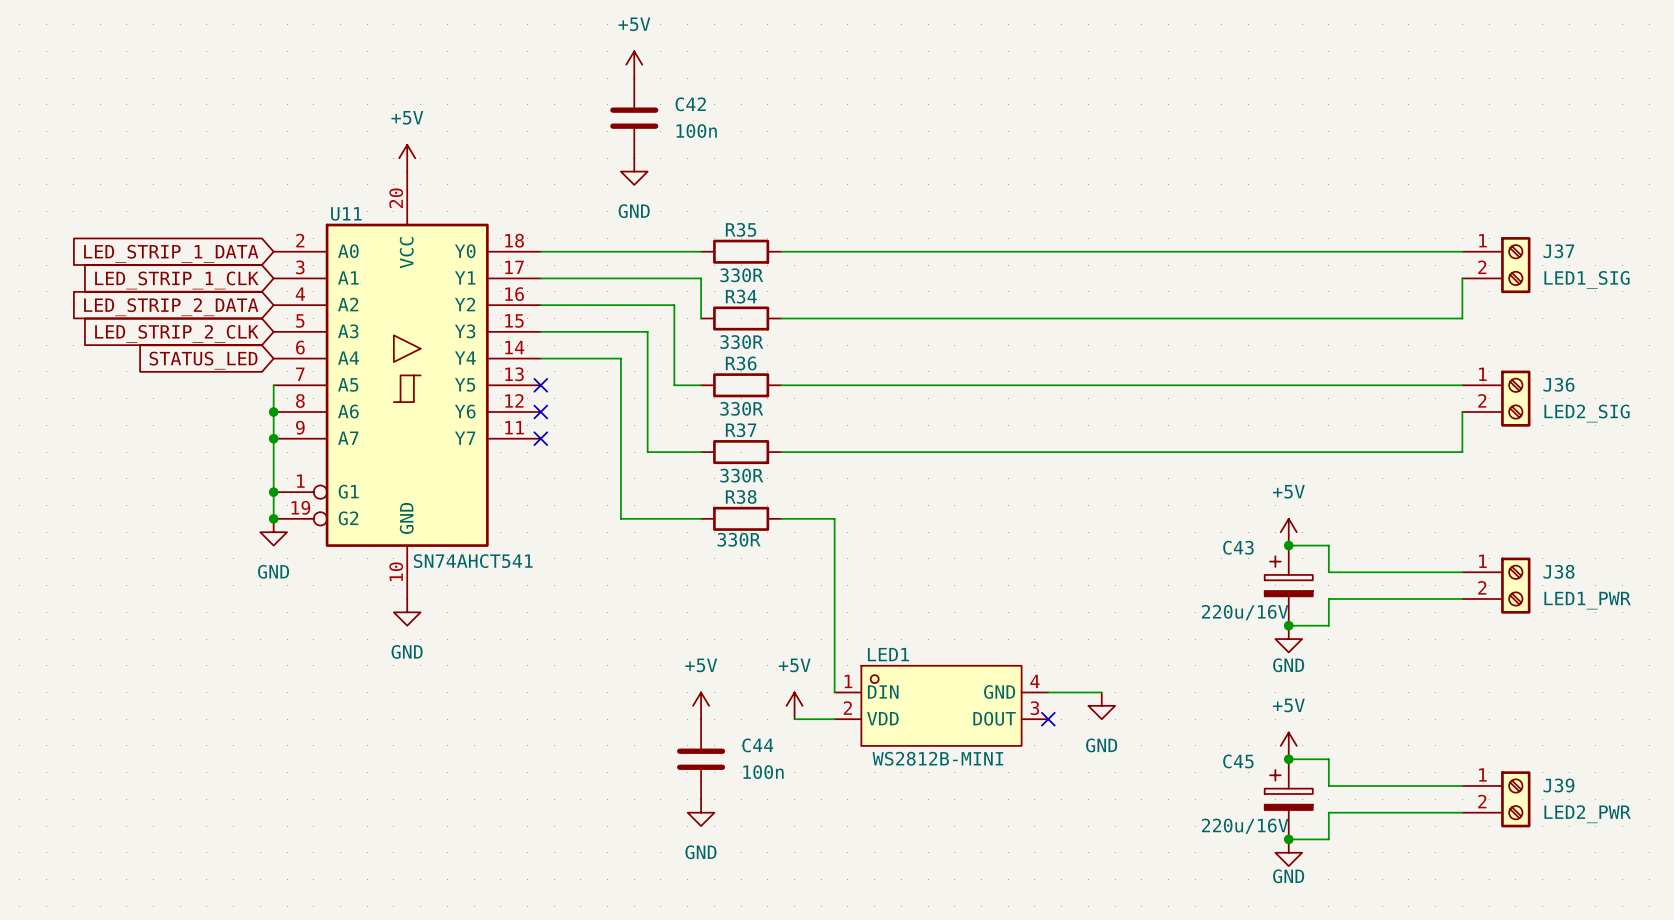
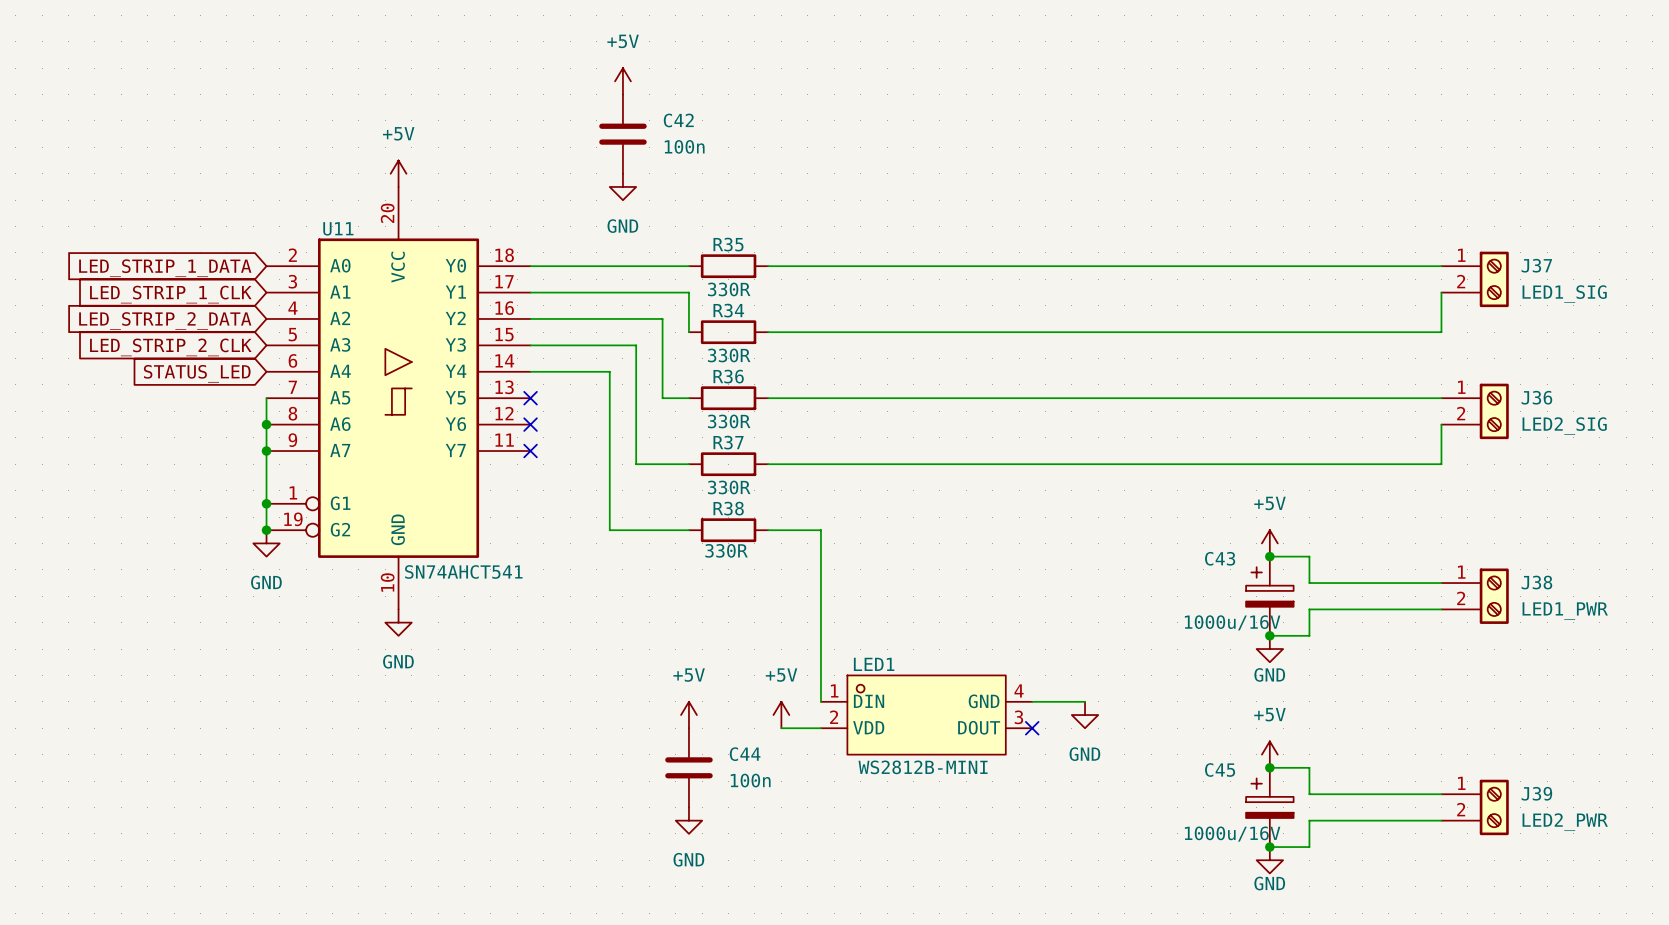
C43 value: 220u/16V (1245, 612) -> 1000u/16V (1232, 622)
C45 value: 220u/16V (1245, 826) -> 1000u/16V (1232, 834)

